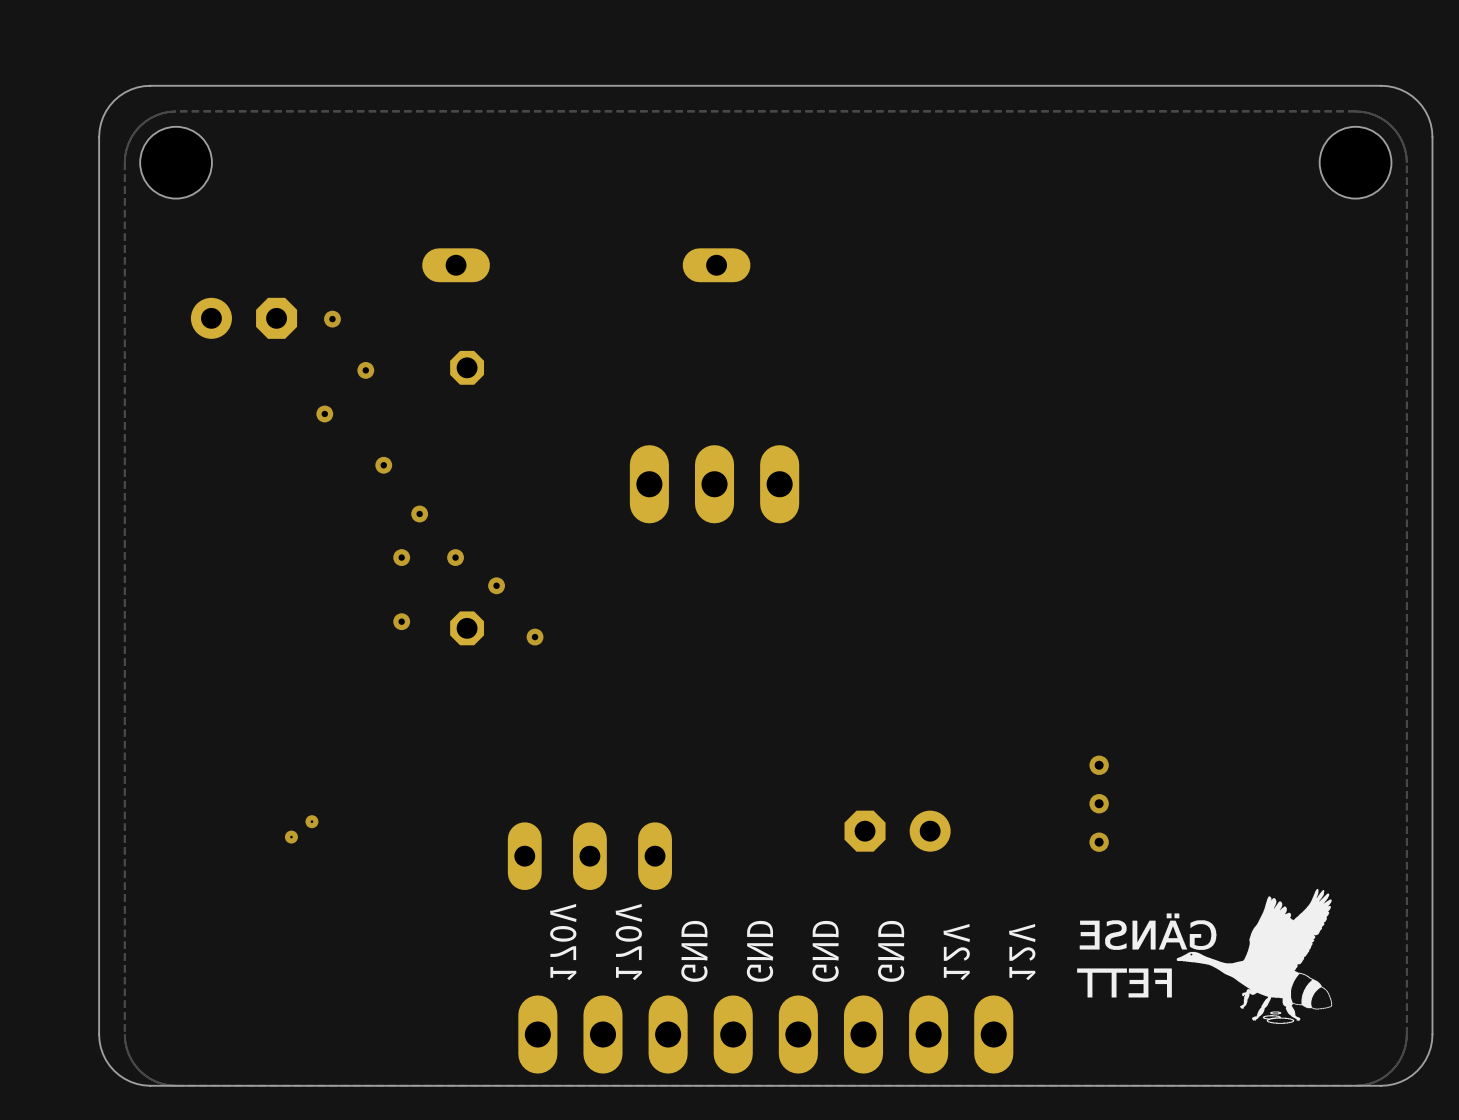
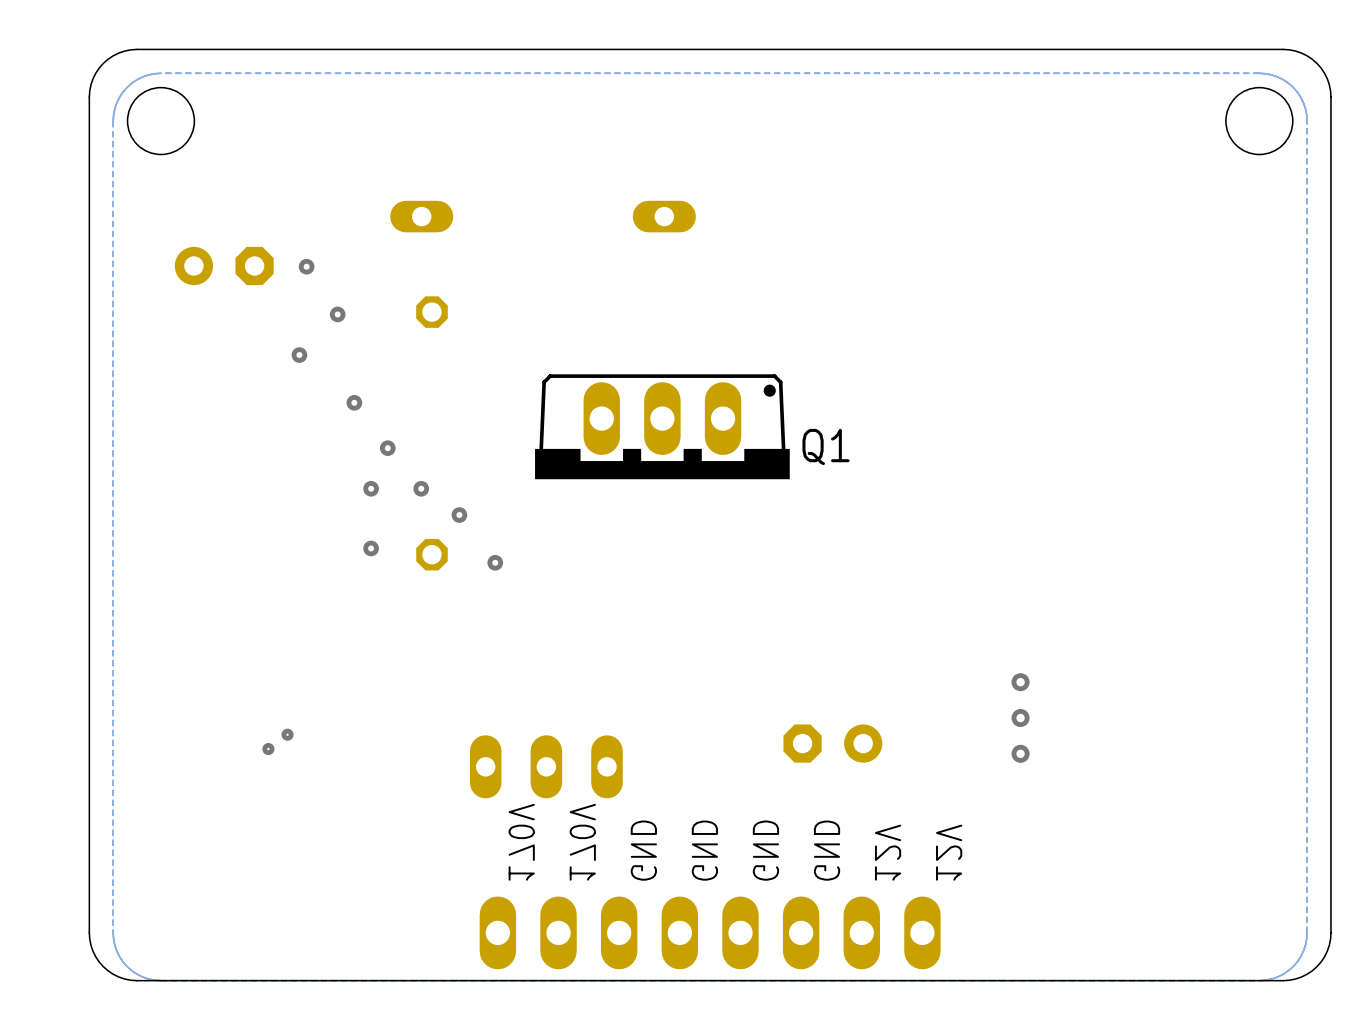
Q1 side: top (714, 484) -> bottom (662, 426)
drawing: [1077, 888, 1333, 1024] -> none

